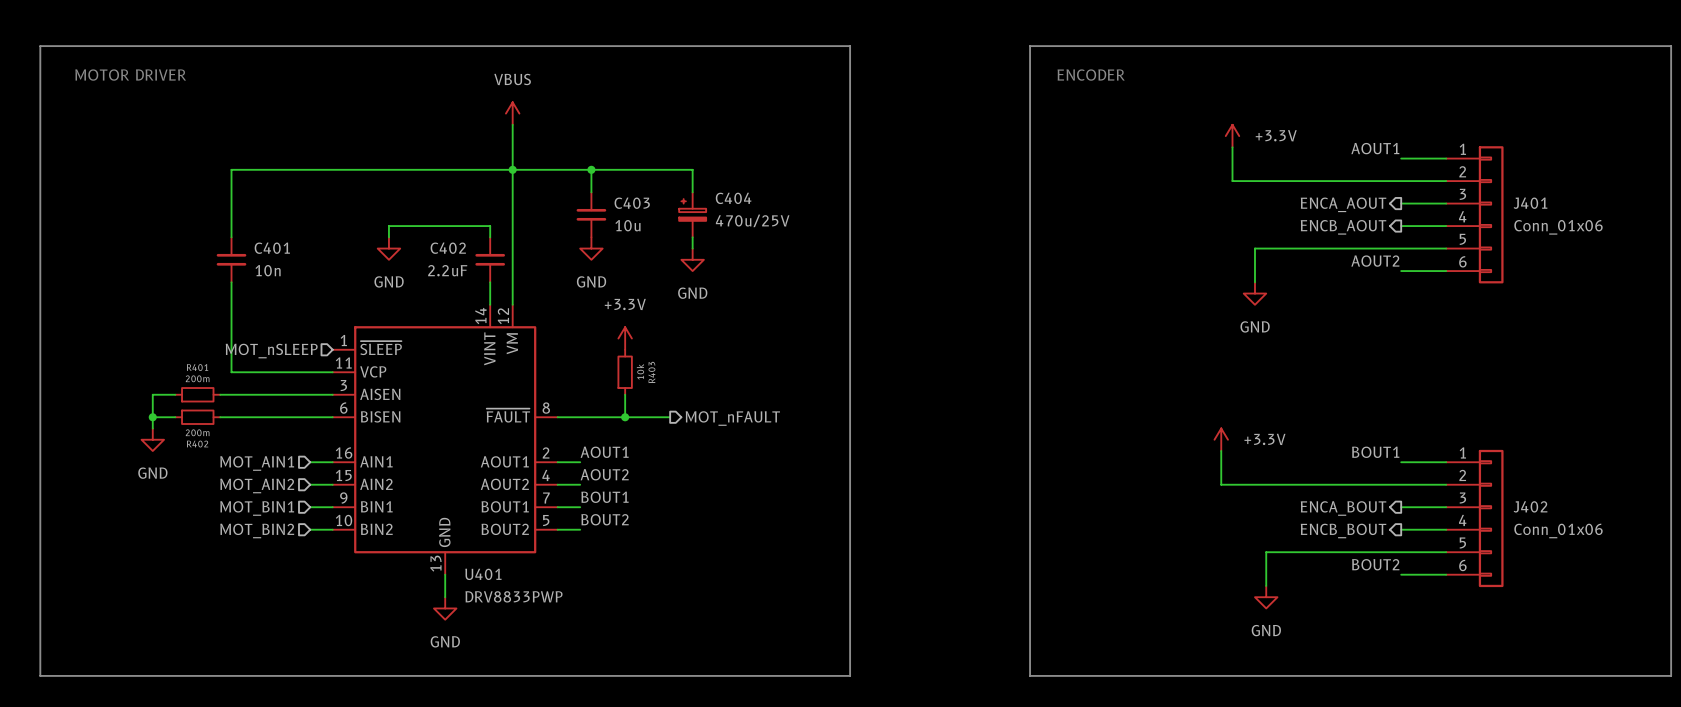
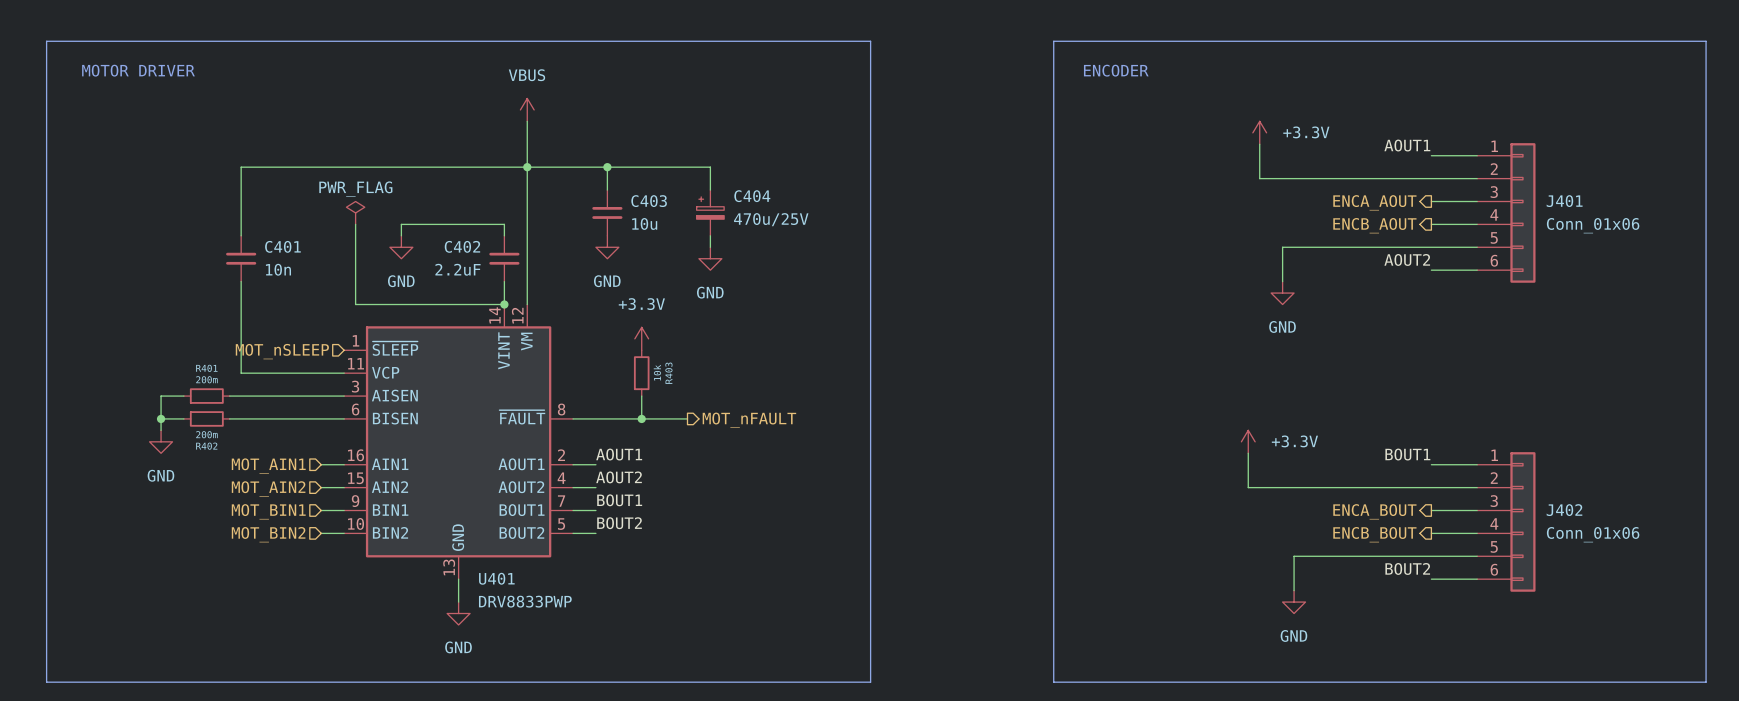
power symbol: none -> PWR_FLAG (355, 212)
wire: none -> (355, 224) (355, 304) (504, 304)
junction: none -> (504, 304)

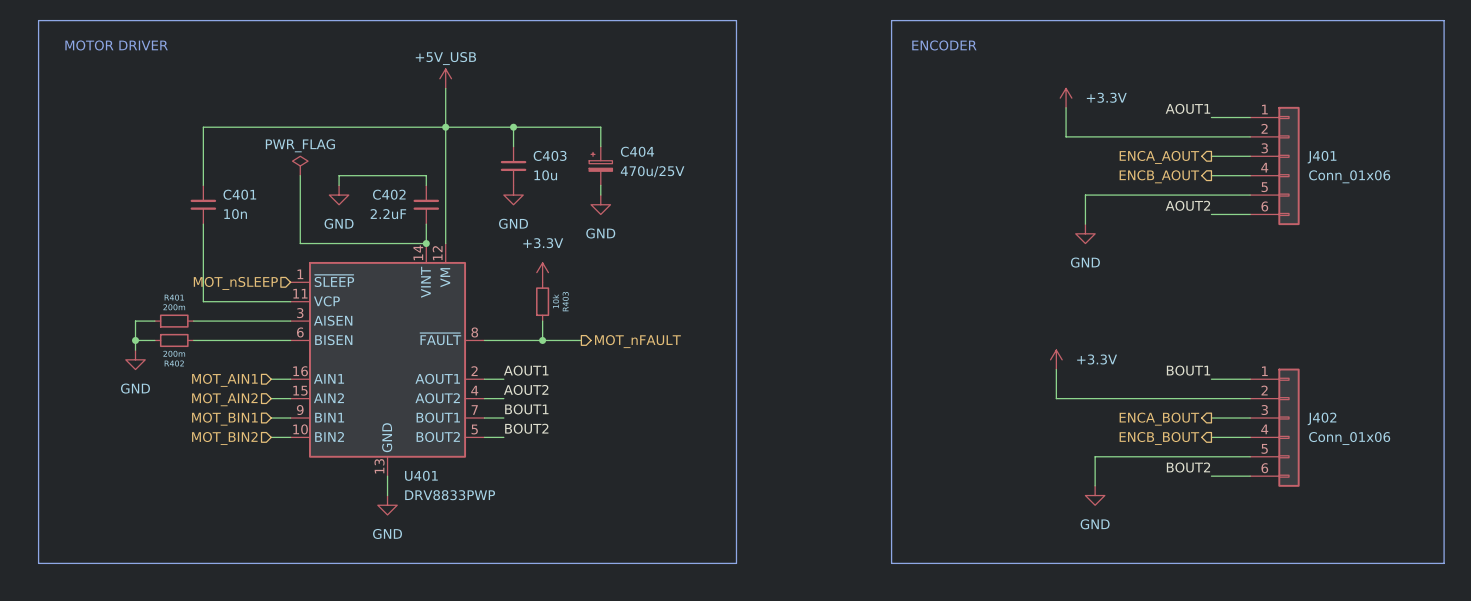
power symbol: VBUS (527, 109) -> +5V_USB (445, 78)

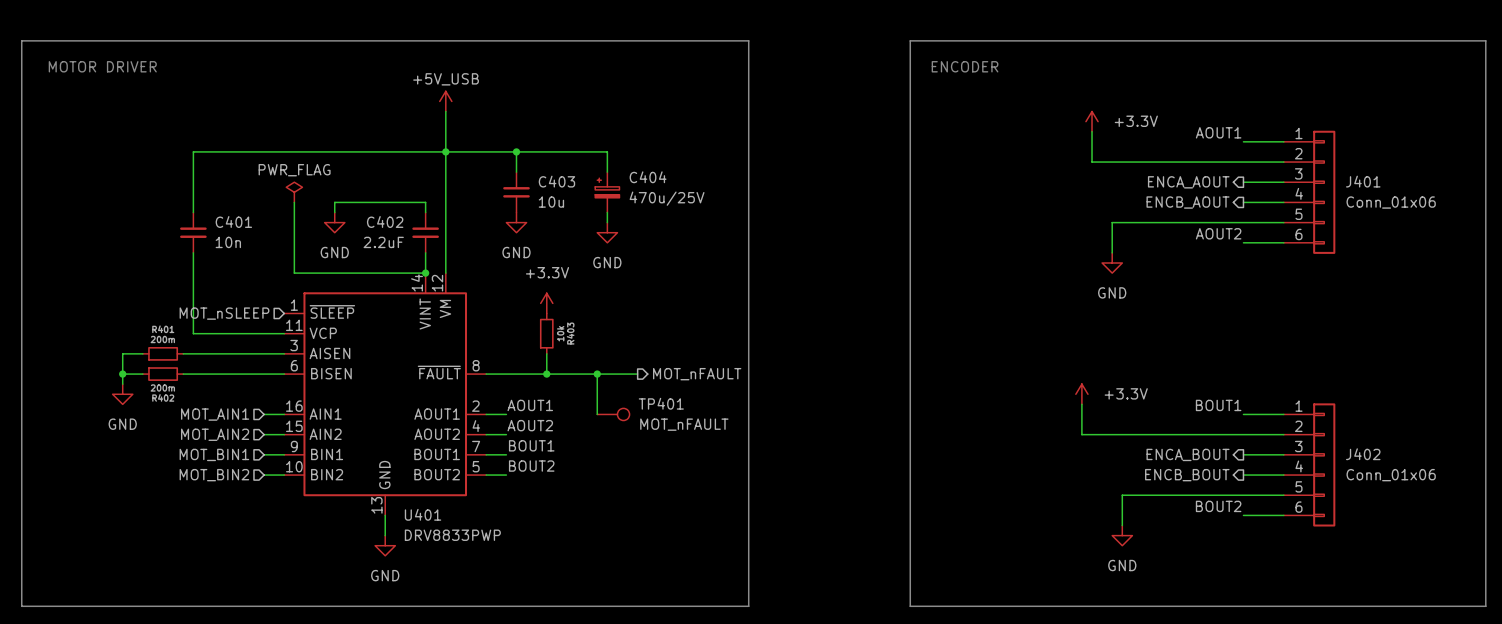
wire: none -> (587, 374) (637, 374)
wire: none -> (597, 374) (597, 414)
junction: none -> (597, 374)
hierarchical label position: MOT_nFAULT (637, 341) -> MOT_nFAULT (697, 374)
TP401: none -> MOT_nFAULT (613, 414)

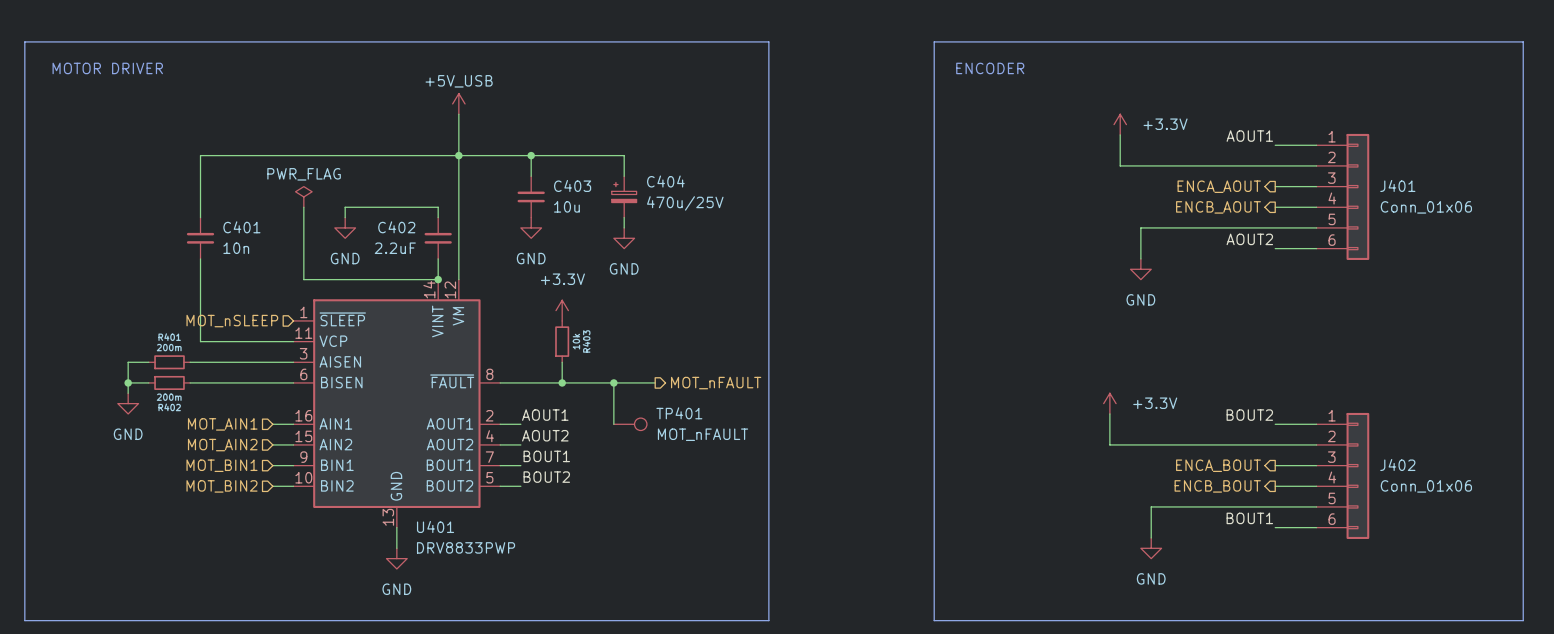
label: BOUT1 (1218, 405) -> BOUT2 (1249, 415)
label: BOUT2 (1218, 506) -> BOUT1 (1249, 518)

